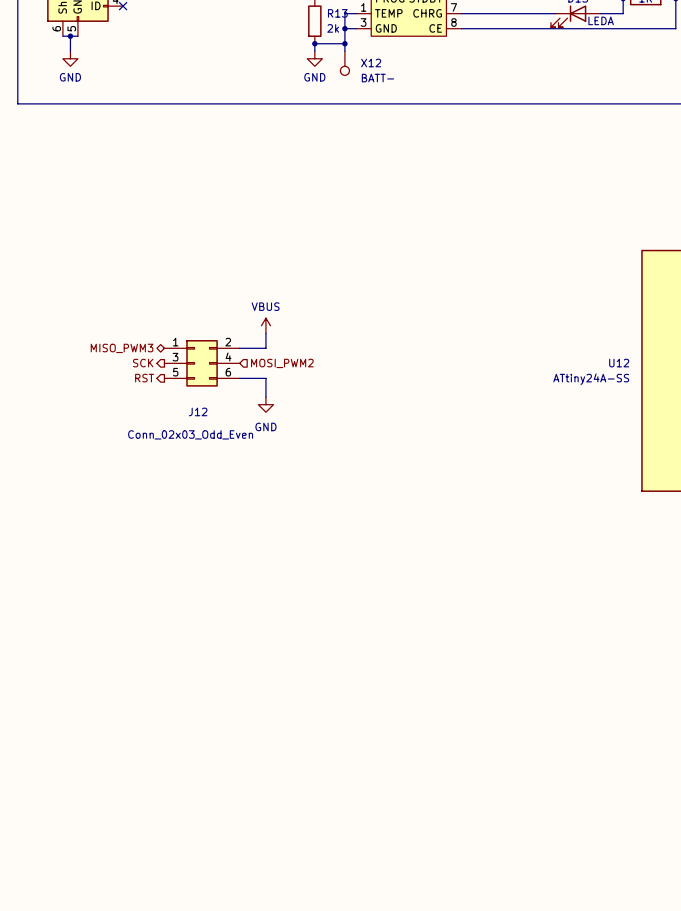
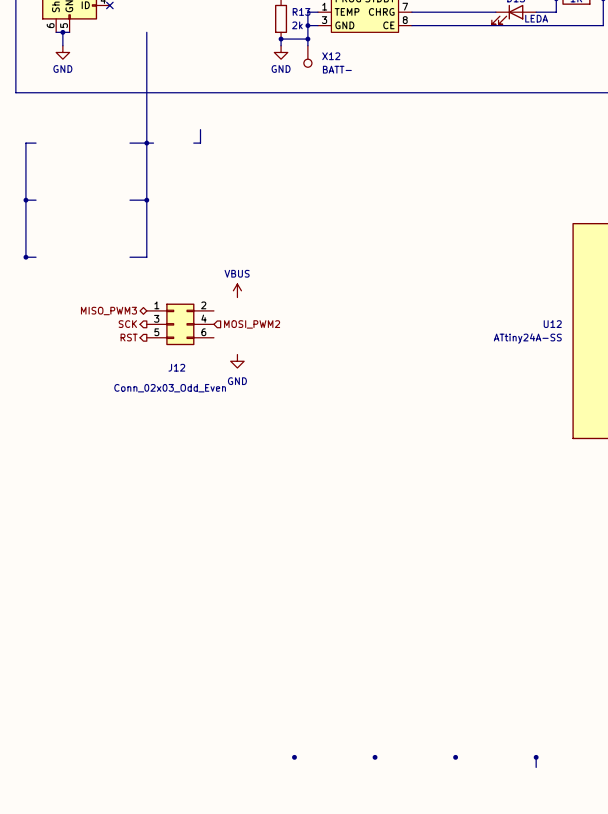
wire: none -> (146, 32) (146, 257) (130, 257)
wire: none -> (200, 129) (200, 143) (193, 143)
wire: none -> (36, 143) (25, 143) (25, 257) (36, 257)
wire: none -> (130, 143) (153, 143)
junction: none -> (146, 143)
wire: none -> (25, 200) (36, 200)
junction: none -> (25, 200)
wire: none -> (130, 200) (146, 200)
junction: none -> (146, 200)
junction: none -> (25, 257)
wire: (265, 333) (265, 348) (239, 348) -> none
wire: (239, 378) (265, 378) (265, 397) -> none
junction: none -> (294, 757)
junction: none -> (375, 757)
junction: none -> (455, 757)
wire: none -> (536, 757) (536, 767)
junction: none -> (536, 757)

